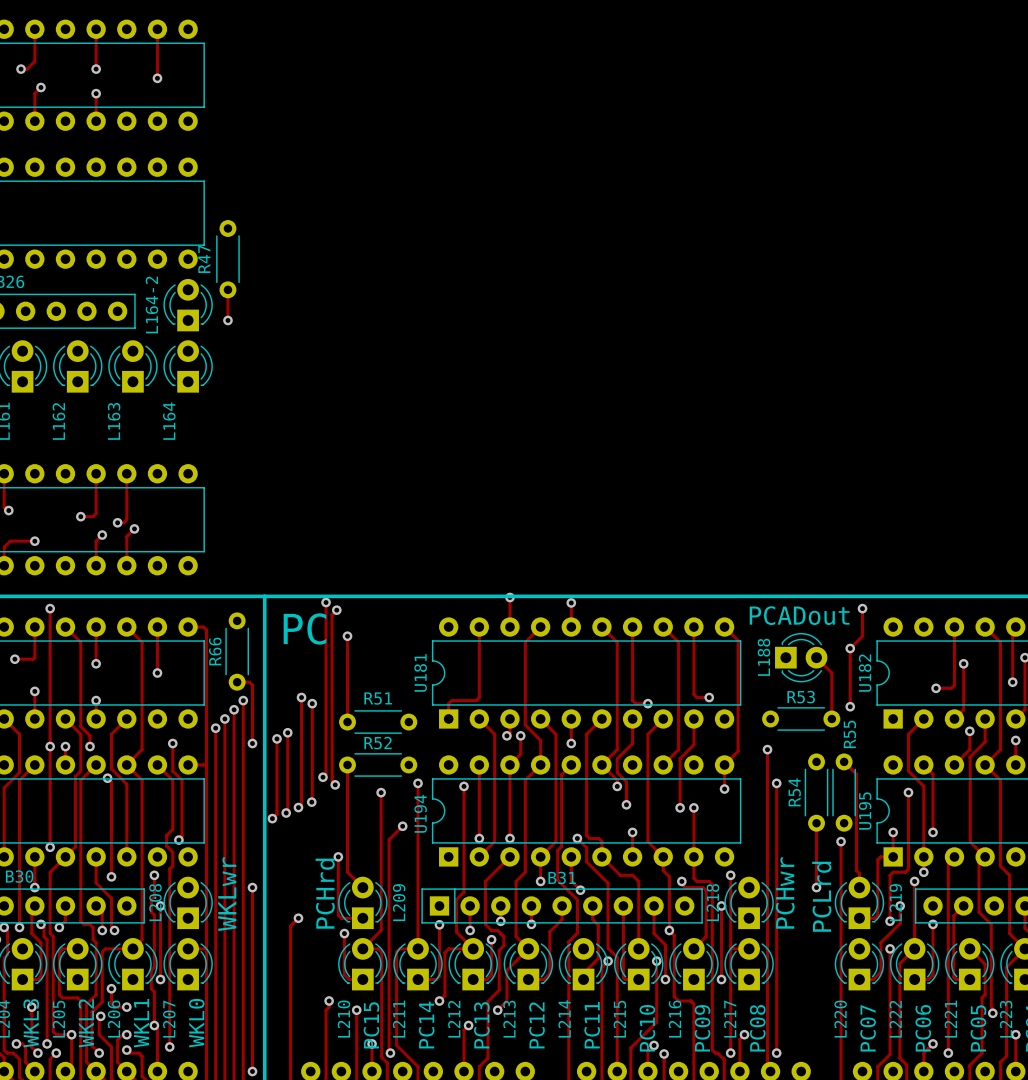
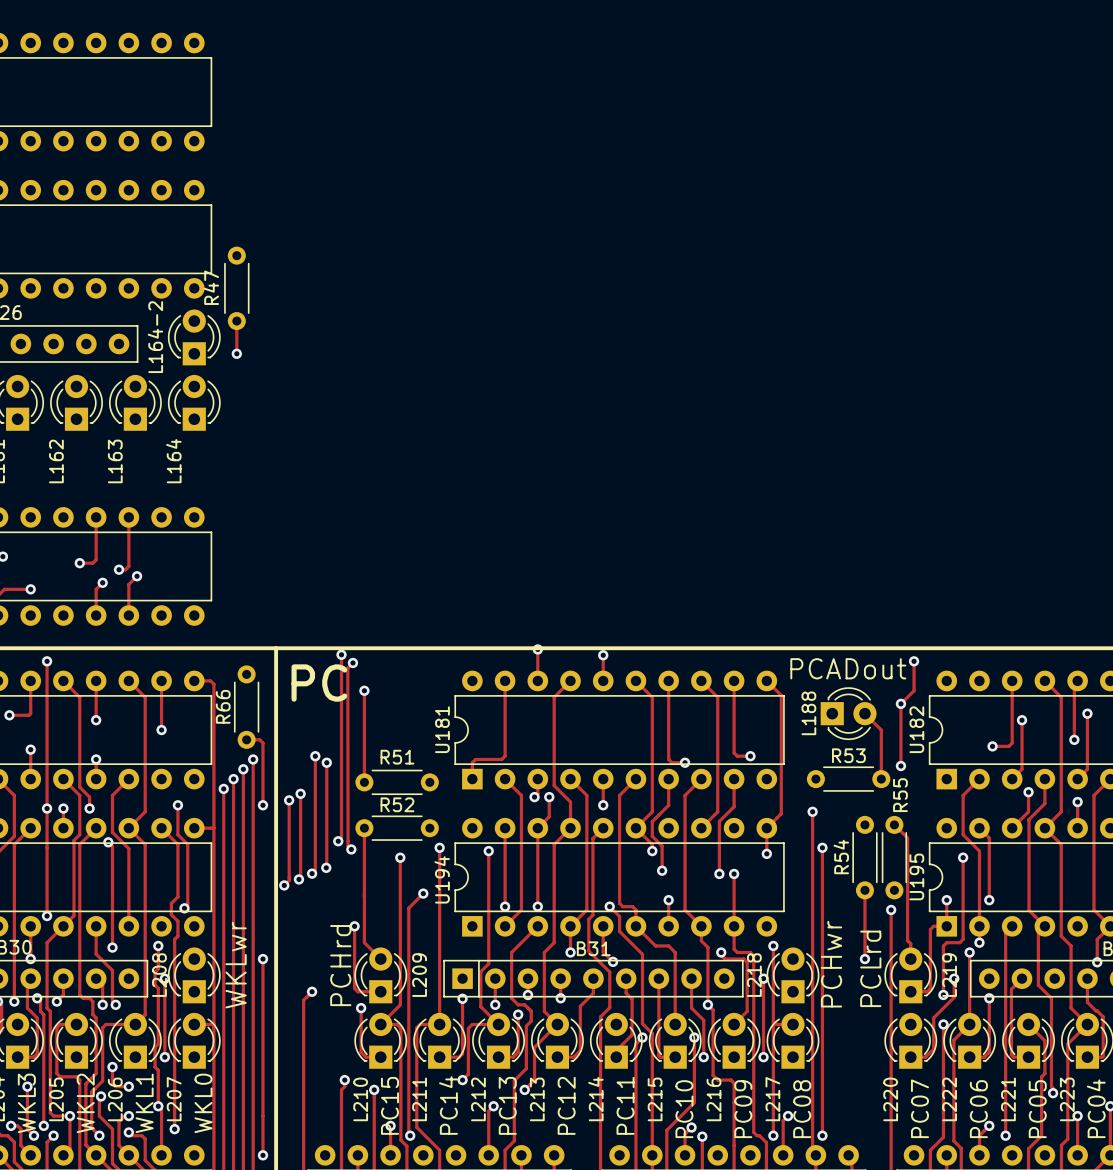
track: (34, 29) (34, 61) (27, 69) (21, 69) -> none
track: (96, 29) (96, 69) -> none
track: (157, 29) (157, 78) -> none
via: (21, 69) -> none
via: (96, 69) -> none
via: (157, 78) -> none
track: (40, 87) (34, 93) (34, 121) -> none
via: (40, 87) -> none
track: (96, 93) (96, 121) -> none
via: (96, 93) -> none

